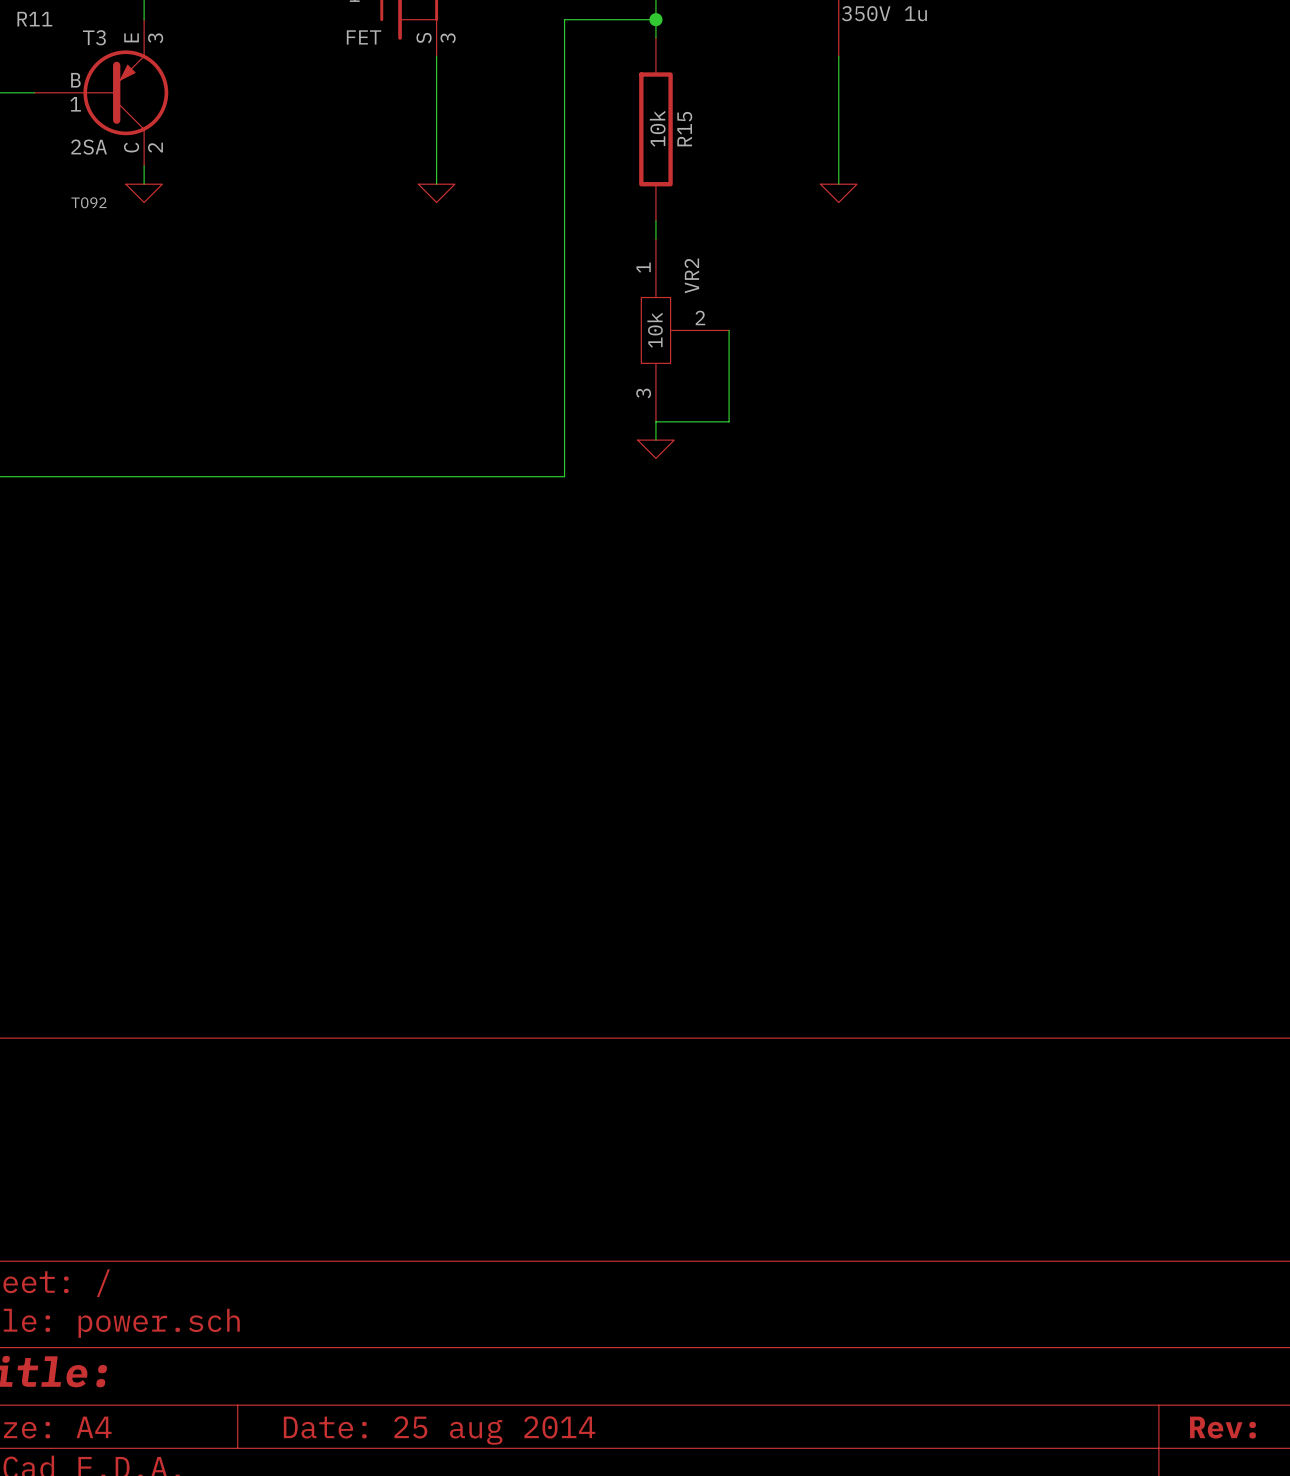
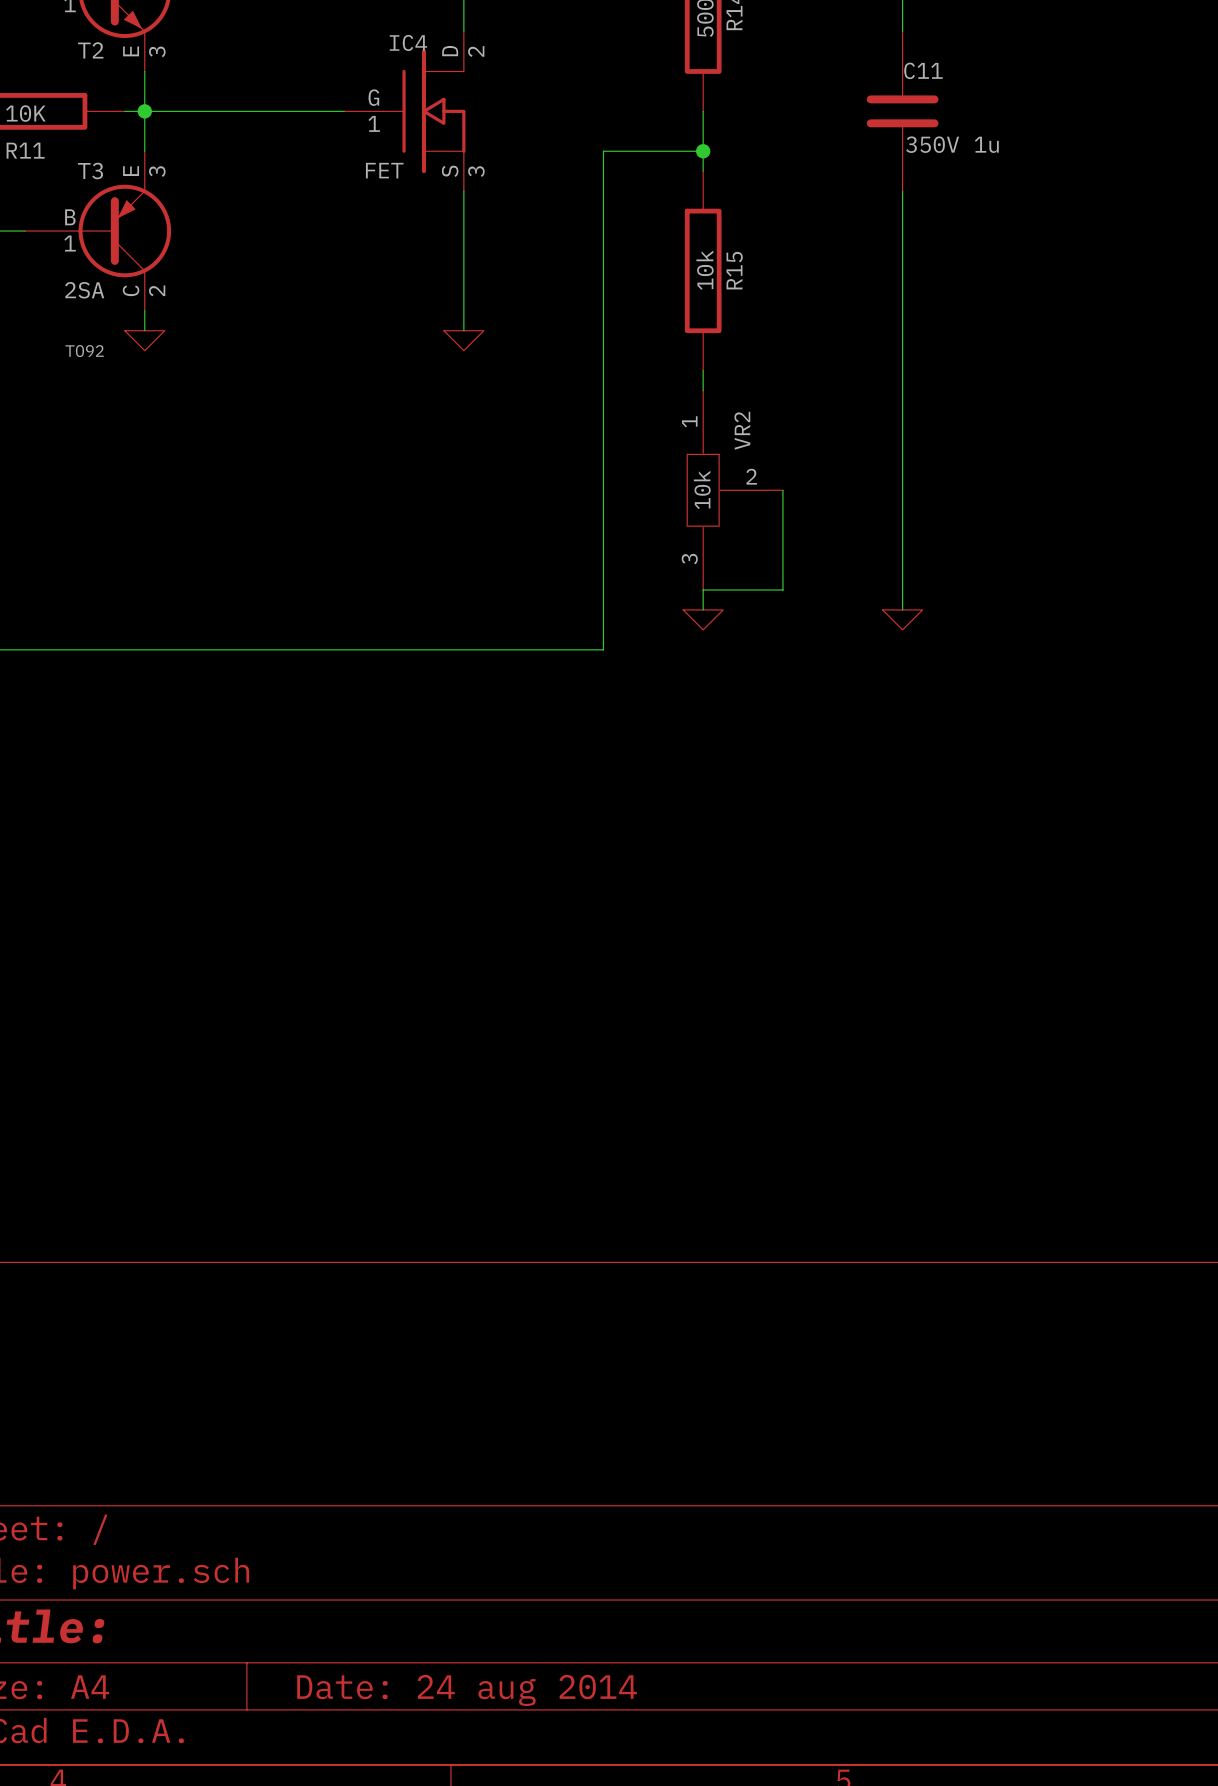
wire: none -> (902, 330) (902, 609)
power symbol position: (838, 193) -> (902, 619)
title block: Date: 25 aug 2014 (439, 1430) -> Date: 24 aug 2014 (467, 1690)

